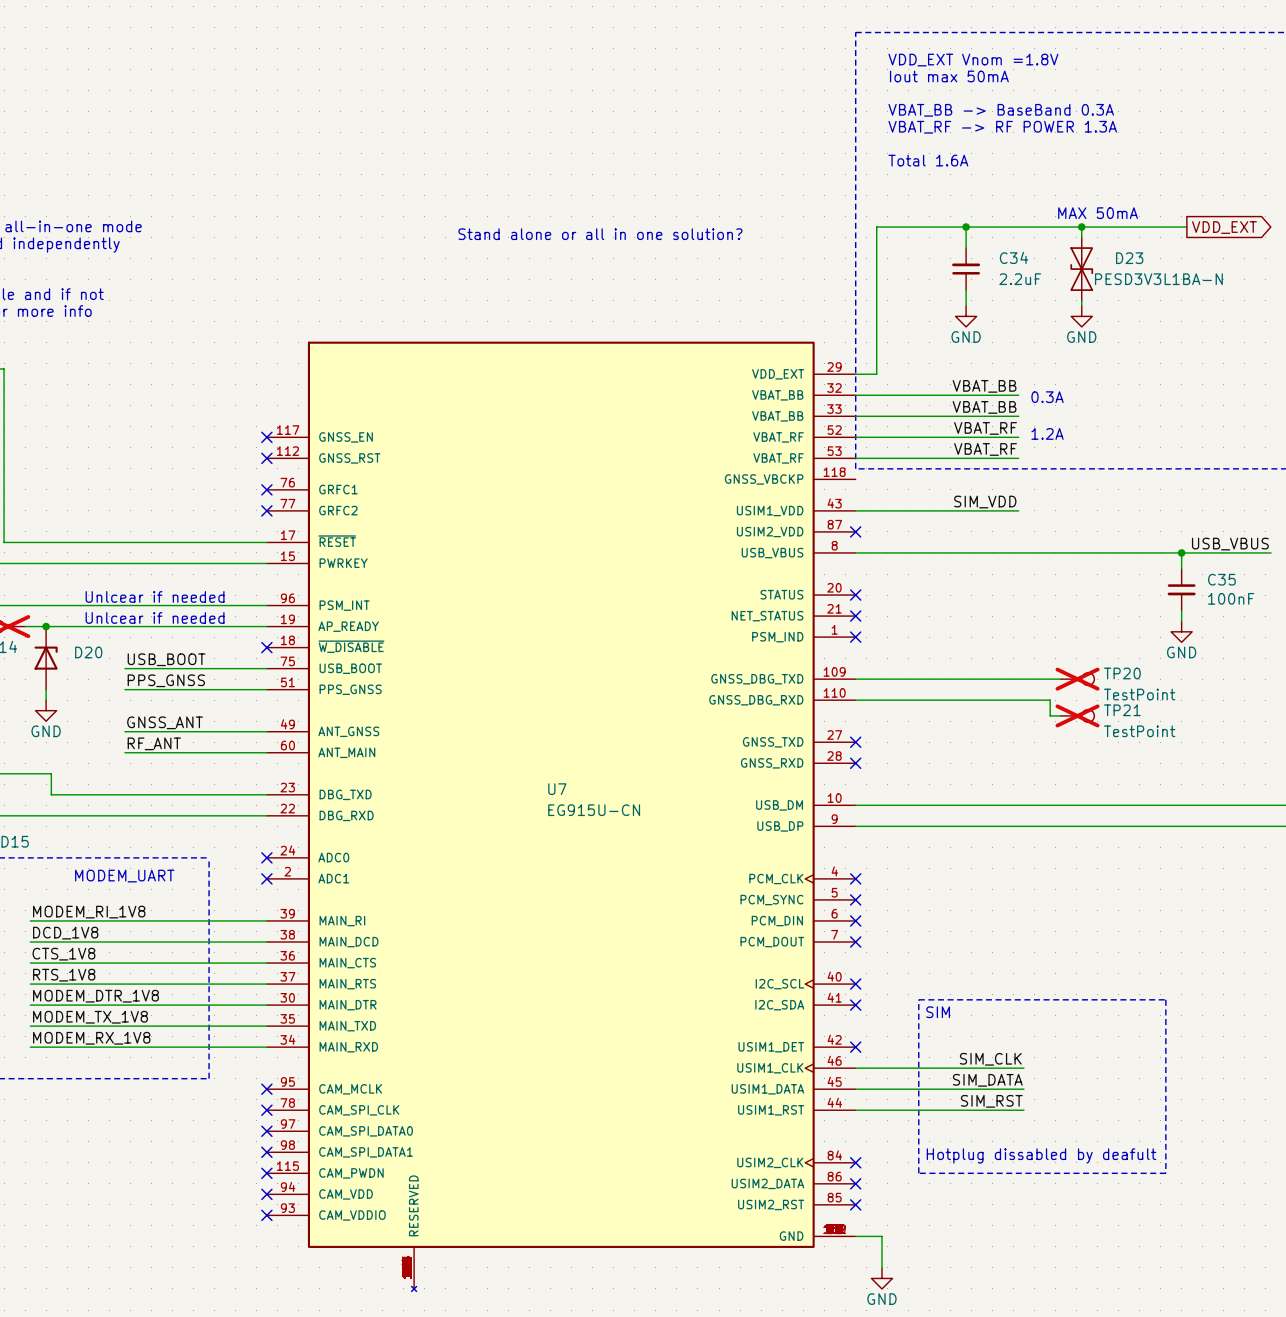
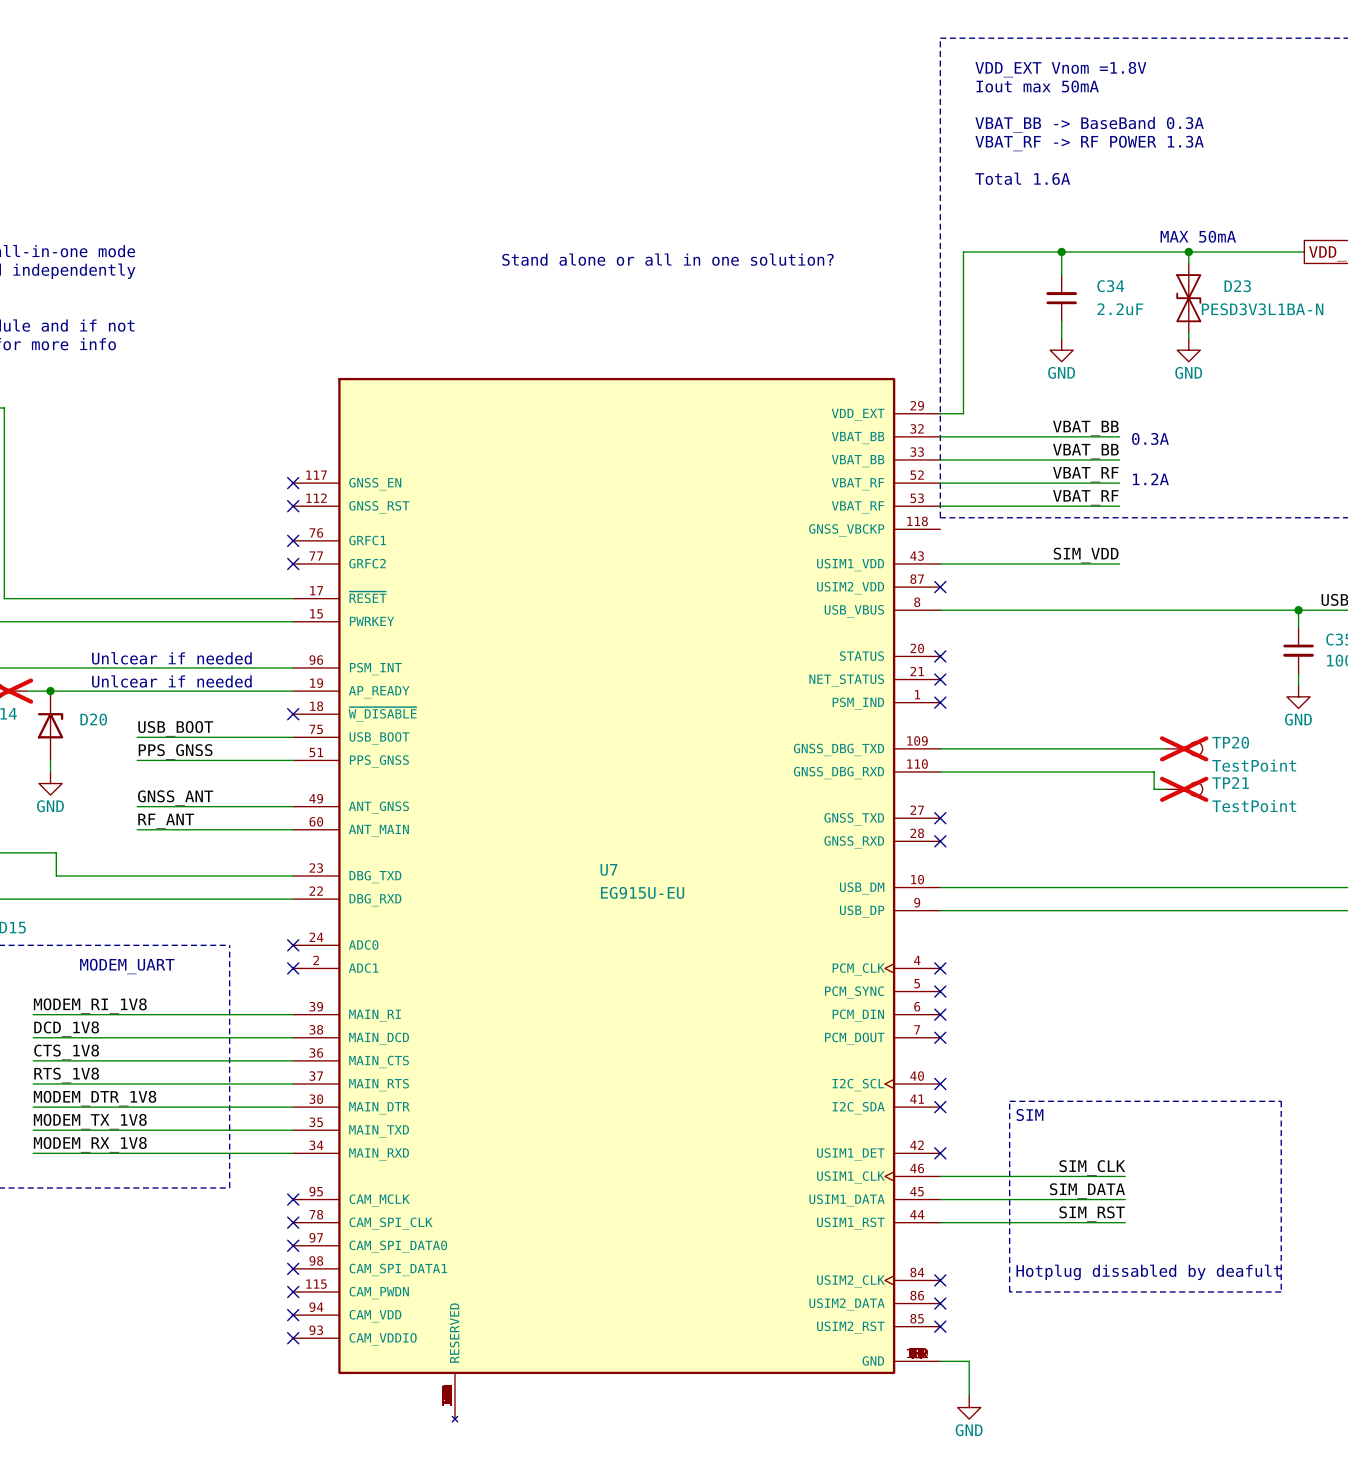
U7 value: EG915U-CN (594, 810) -> EG915U-EU (642, 892)

